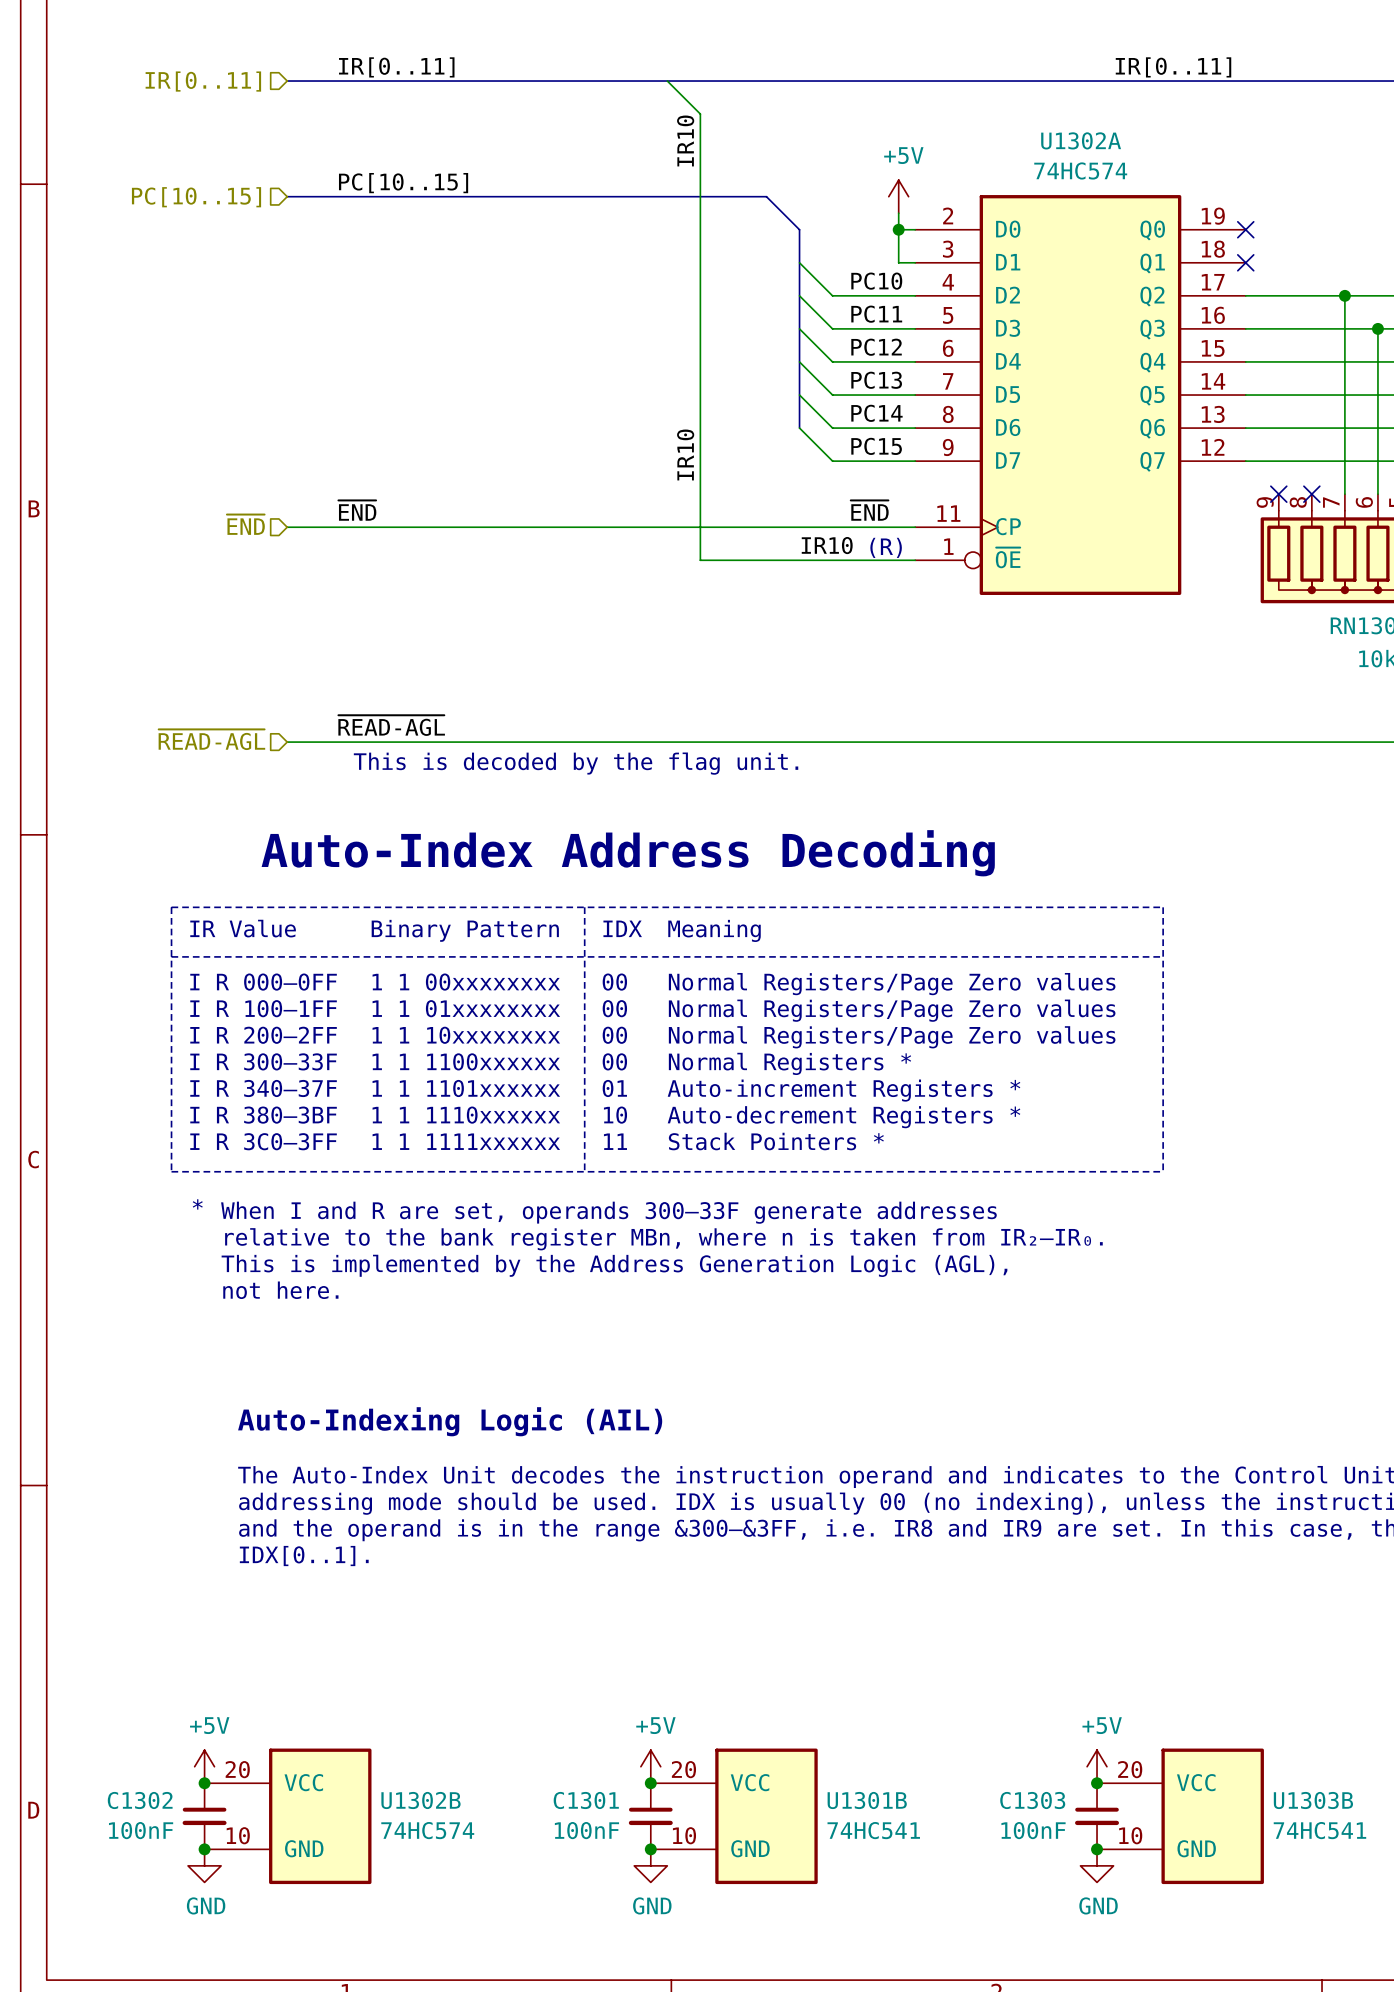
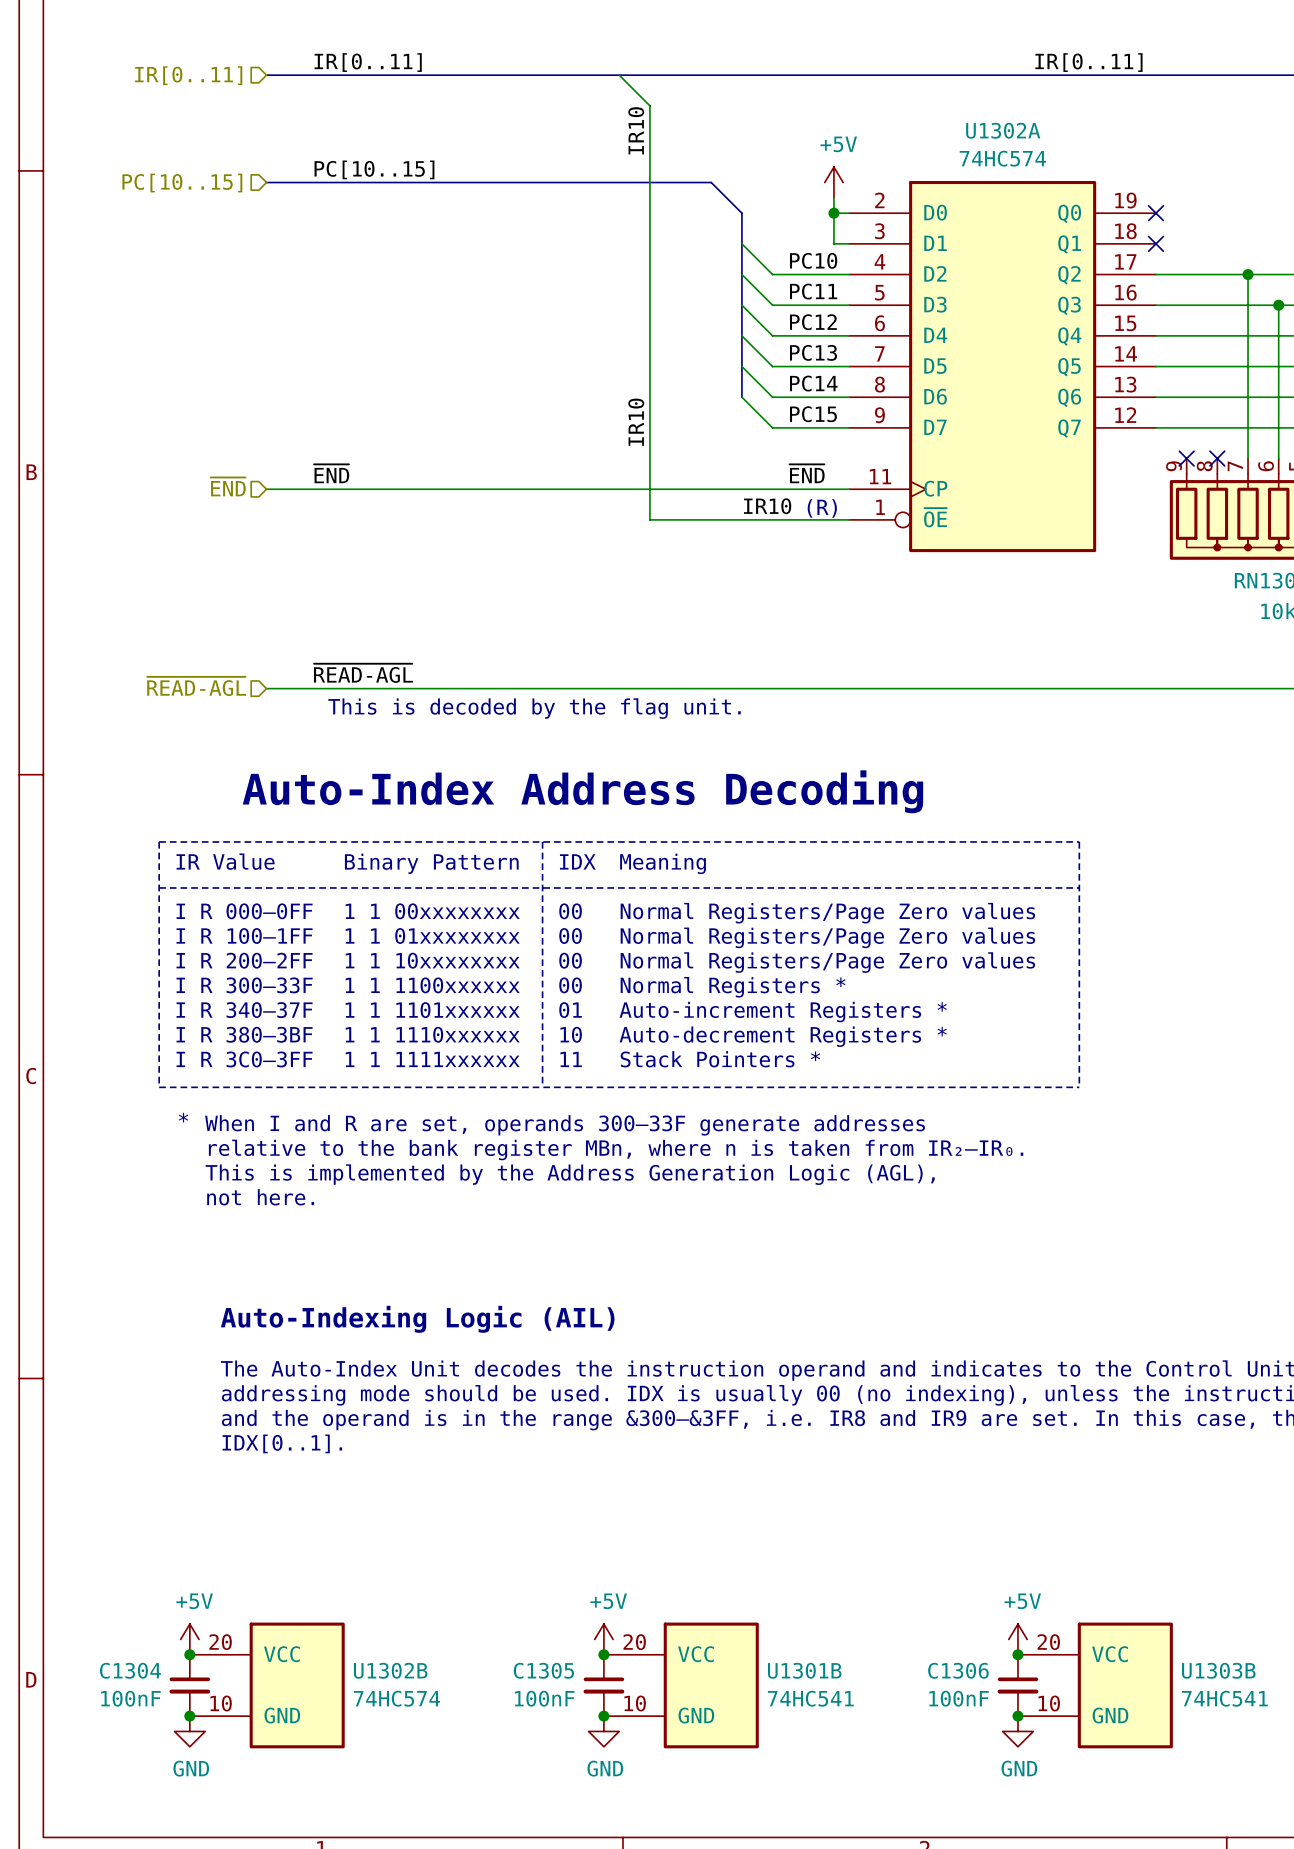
C1302 name: C1302 (140, 1800) -> C1304 (130, 1670)
C1301 name: C1301 (586, 1800) -> C1305 (543, 1670)
C1303 name: C1303 (1032, 1800) -> C1306 (958, 1670)

